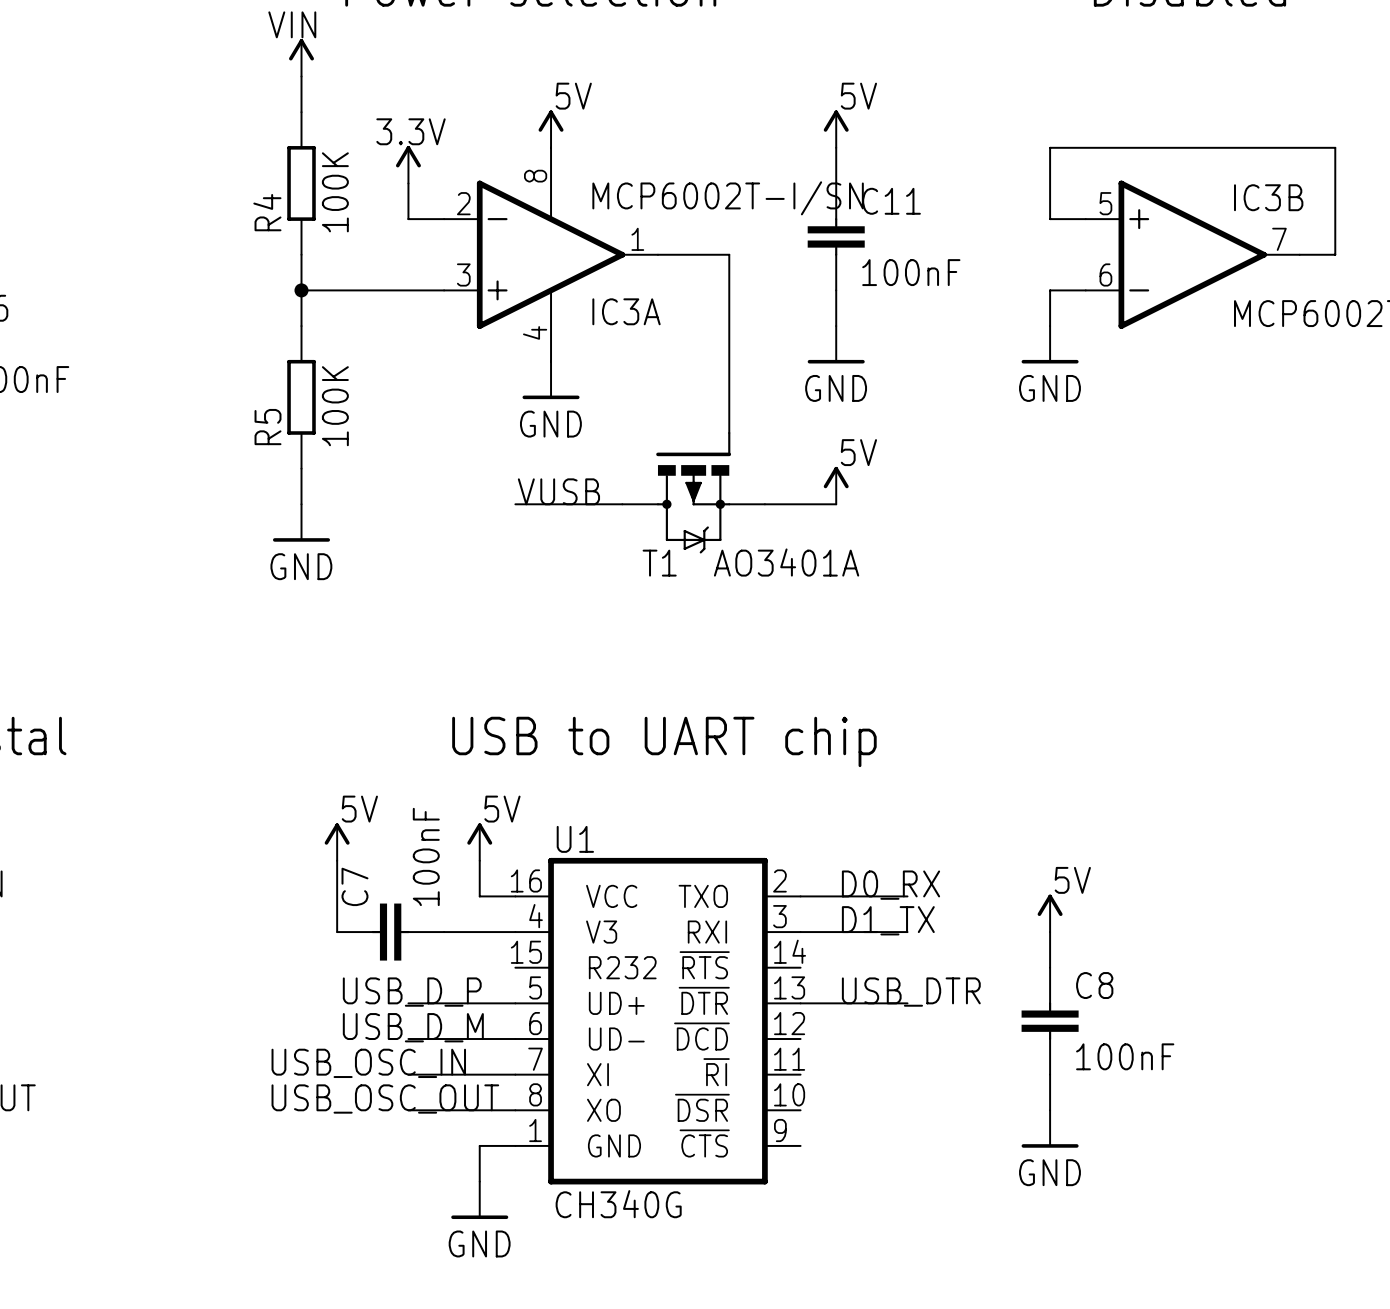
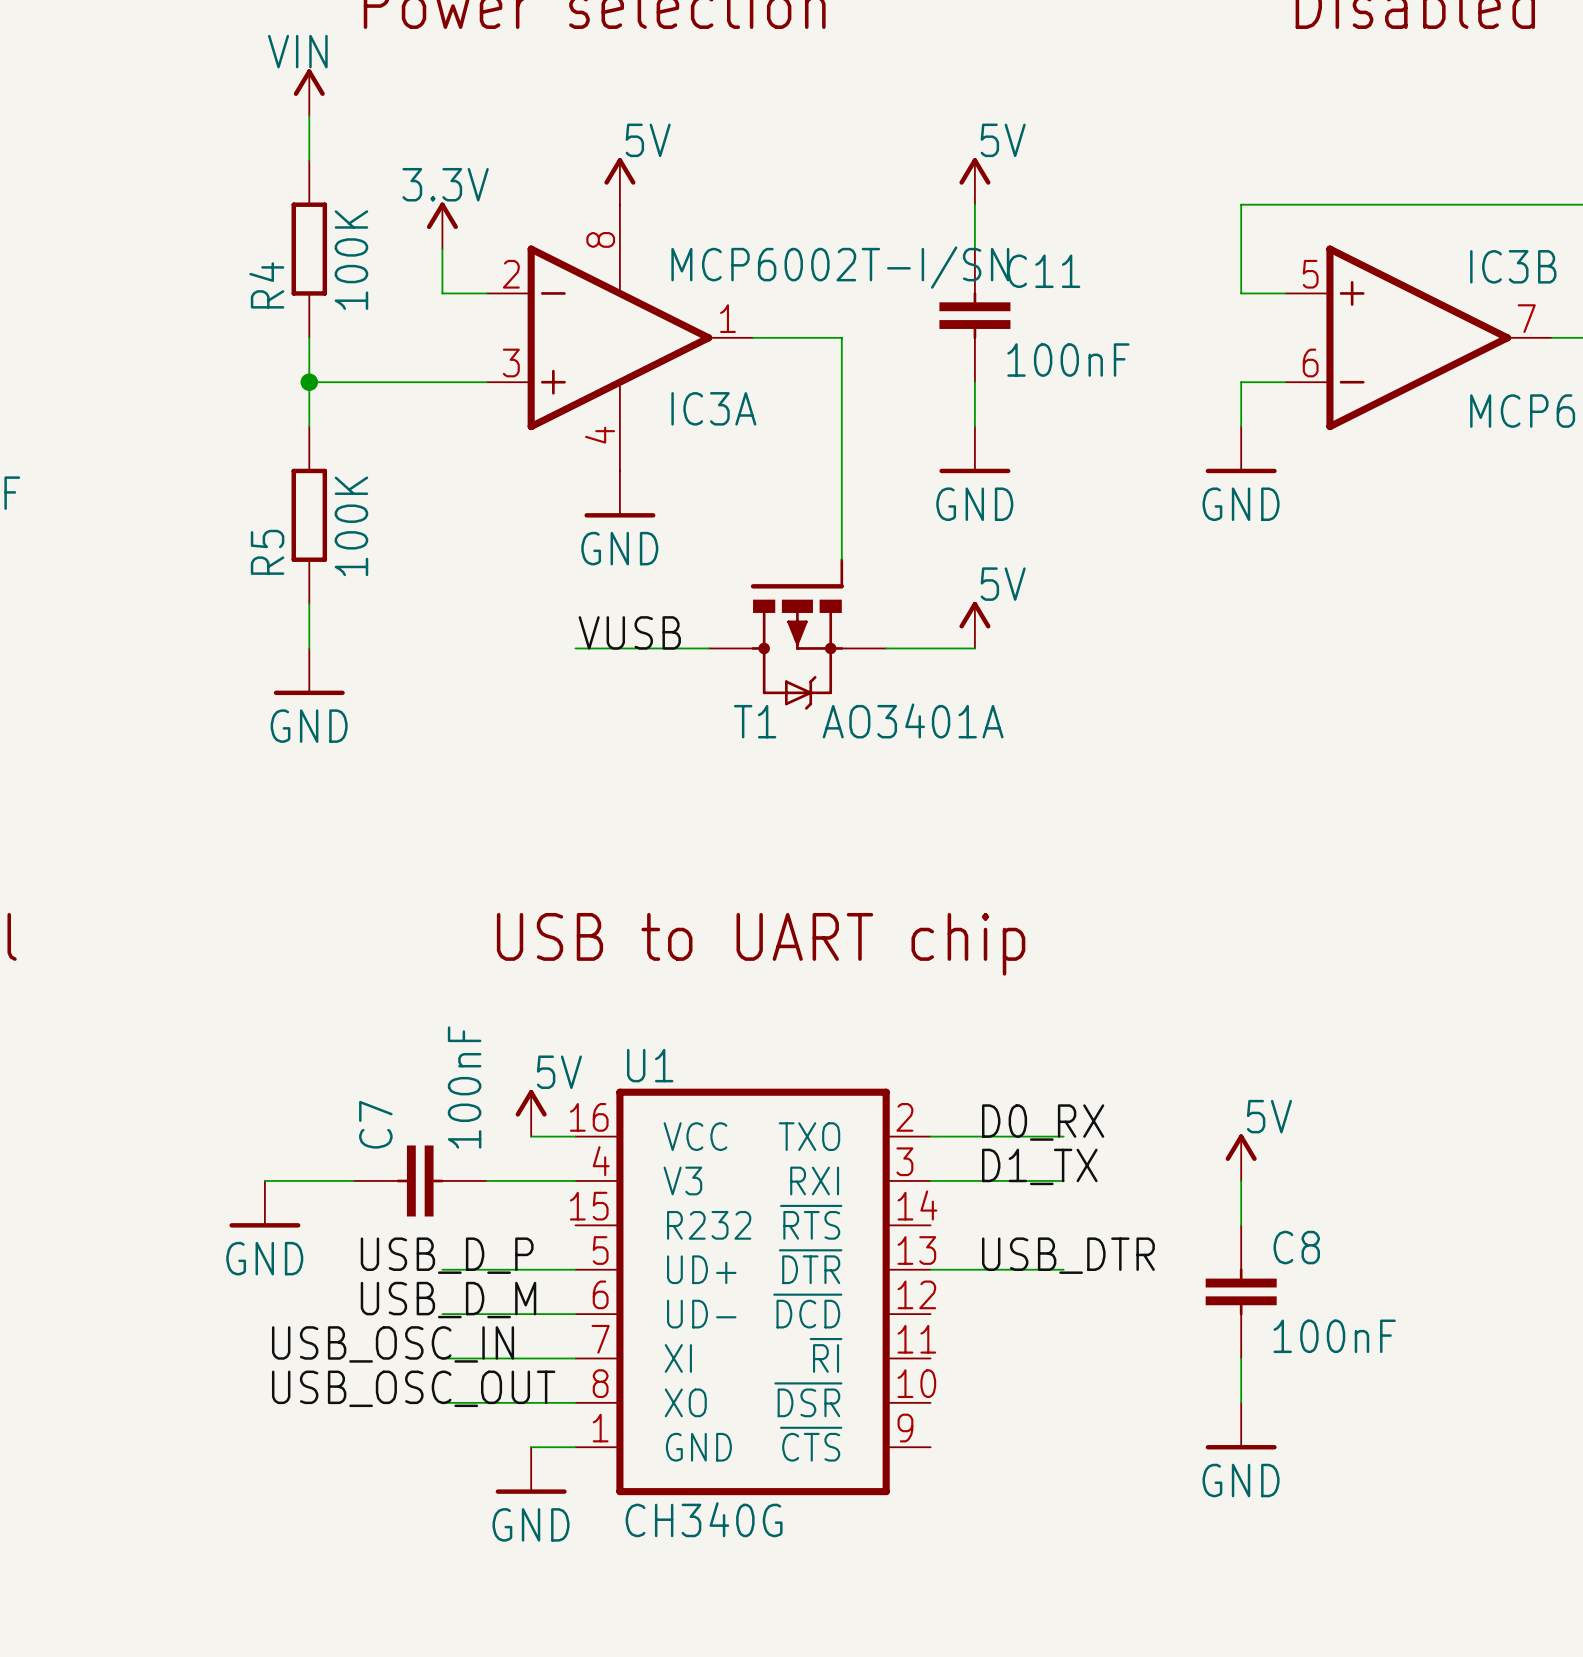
power symbol: 5V (337, 842) -> none
power symbol position: 5V (479, 842) -> 5V (531, 1113)
wire: (337, 860) (337, 932) -> (264, 1180) (353, 1180)
power symbol: none -> GND (264, 1204)
power symbol position: GND (479, 1200) -> GND (531, 1470)

